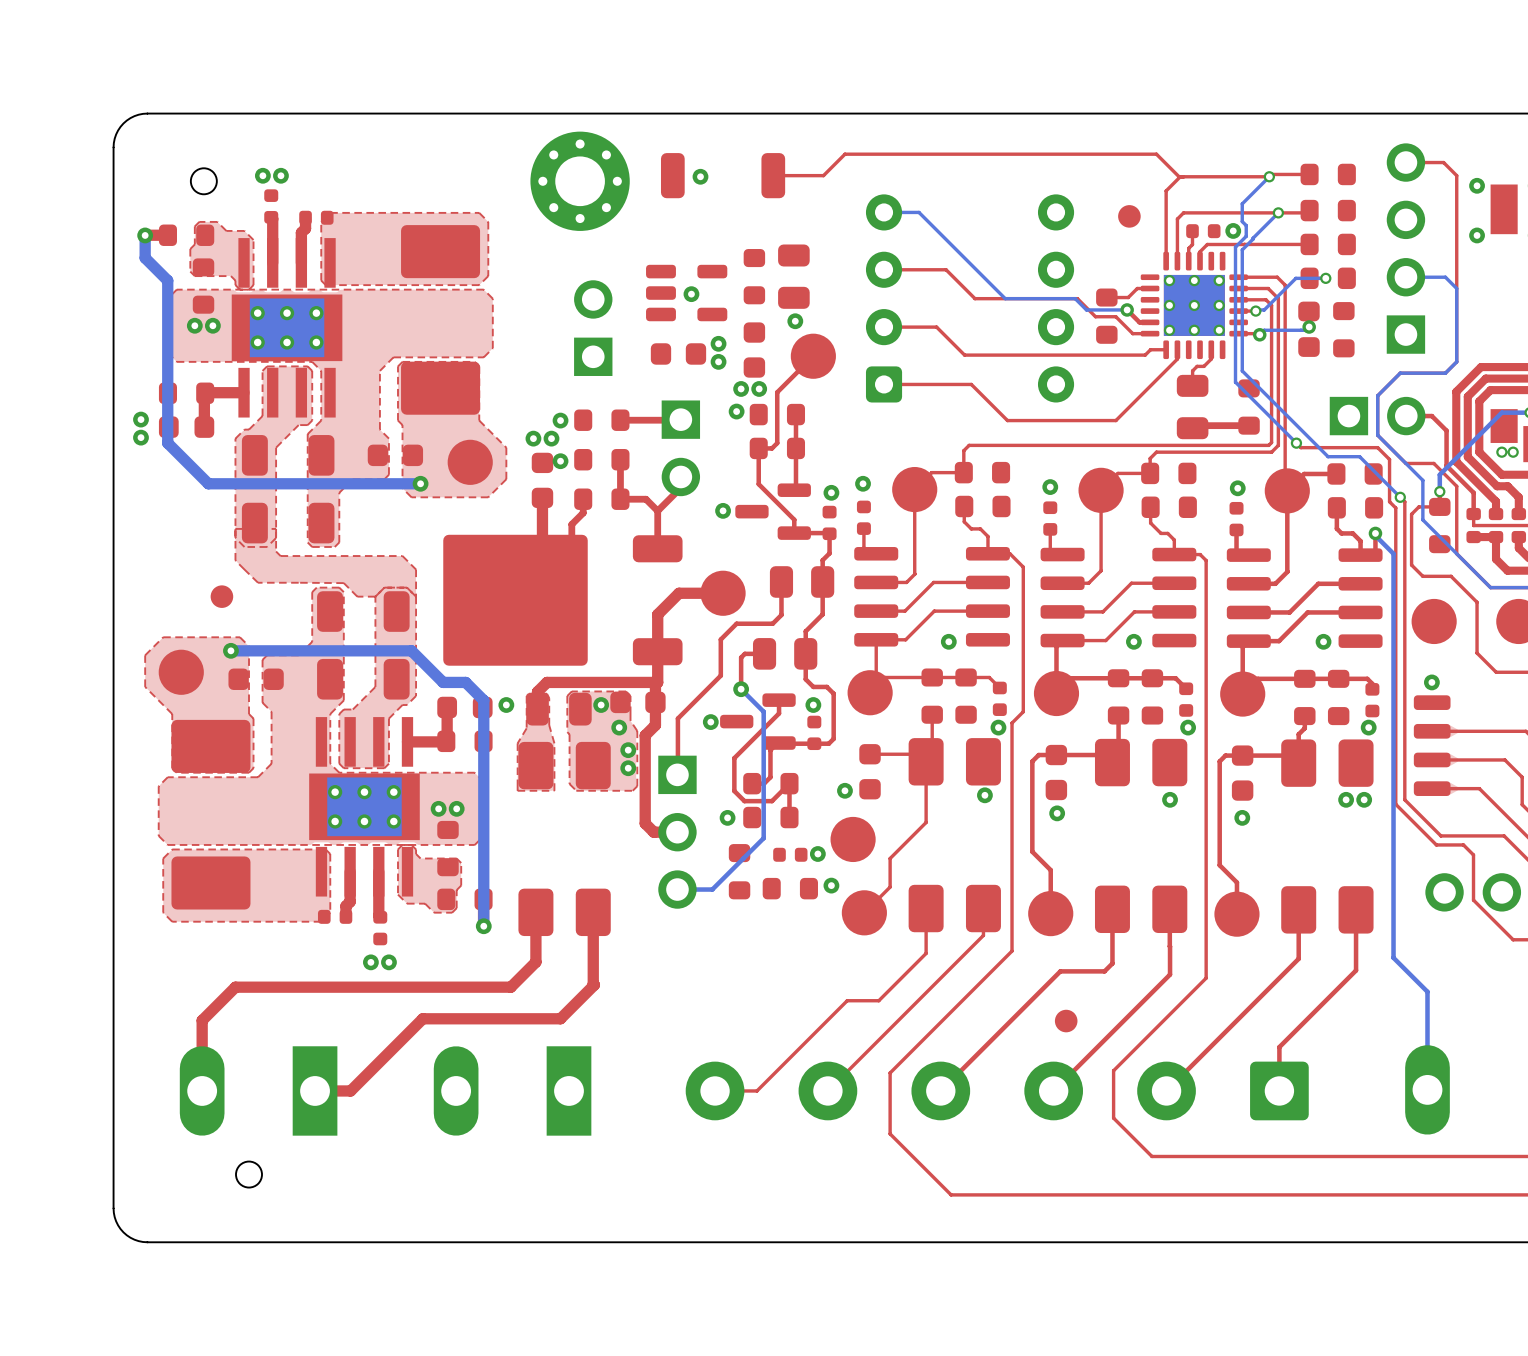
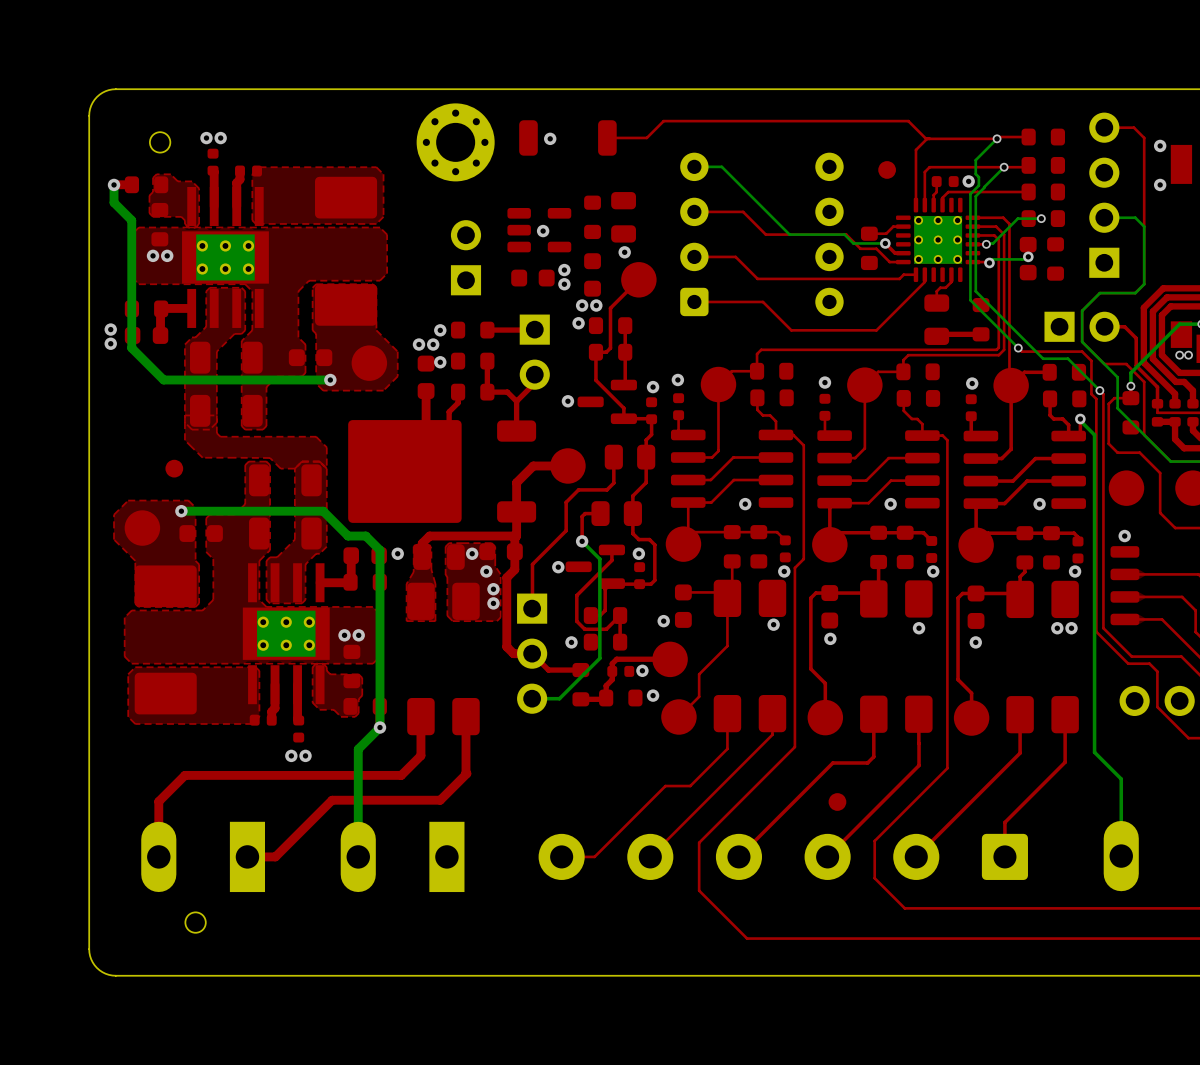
top track: none -> (532, 653) (548, 670) (580, 670)
top track: none -> (669, 659) (616, 659) (612, 663) (612, 679) (606, 685) (606, 697) (580, 699)
bottom track: none -> (379, 727) (358, 749) (358, 856)

